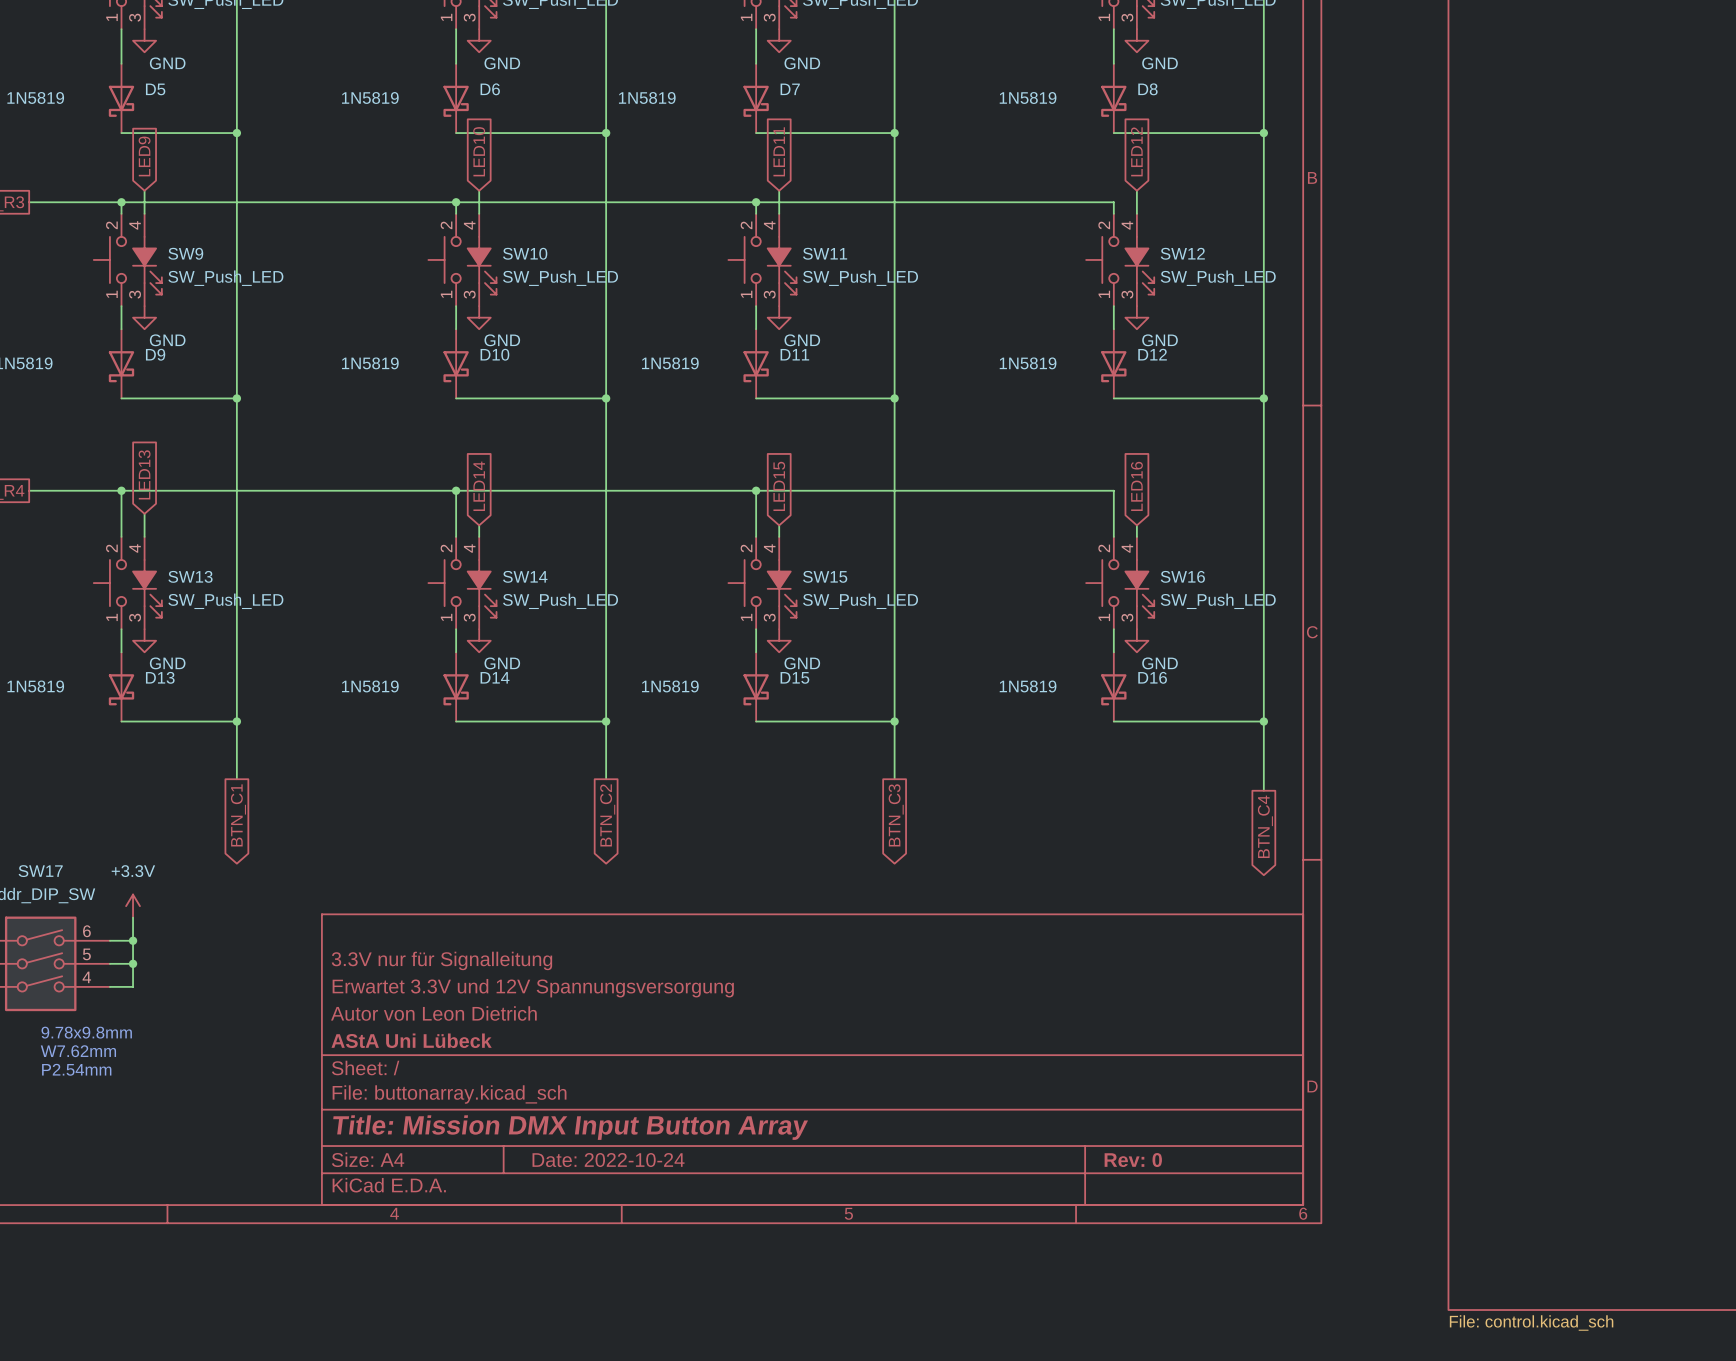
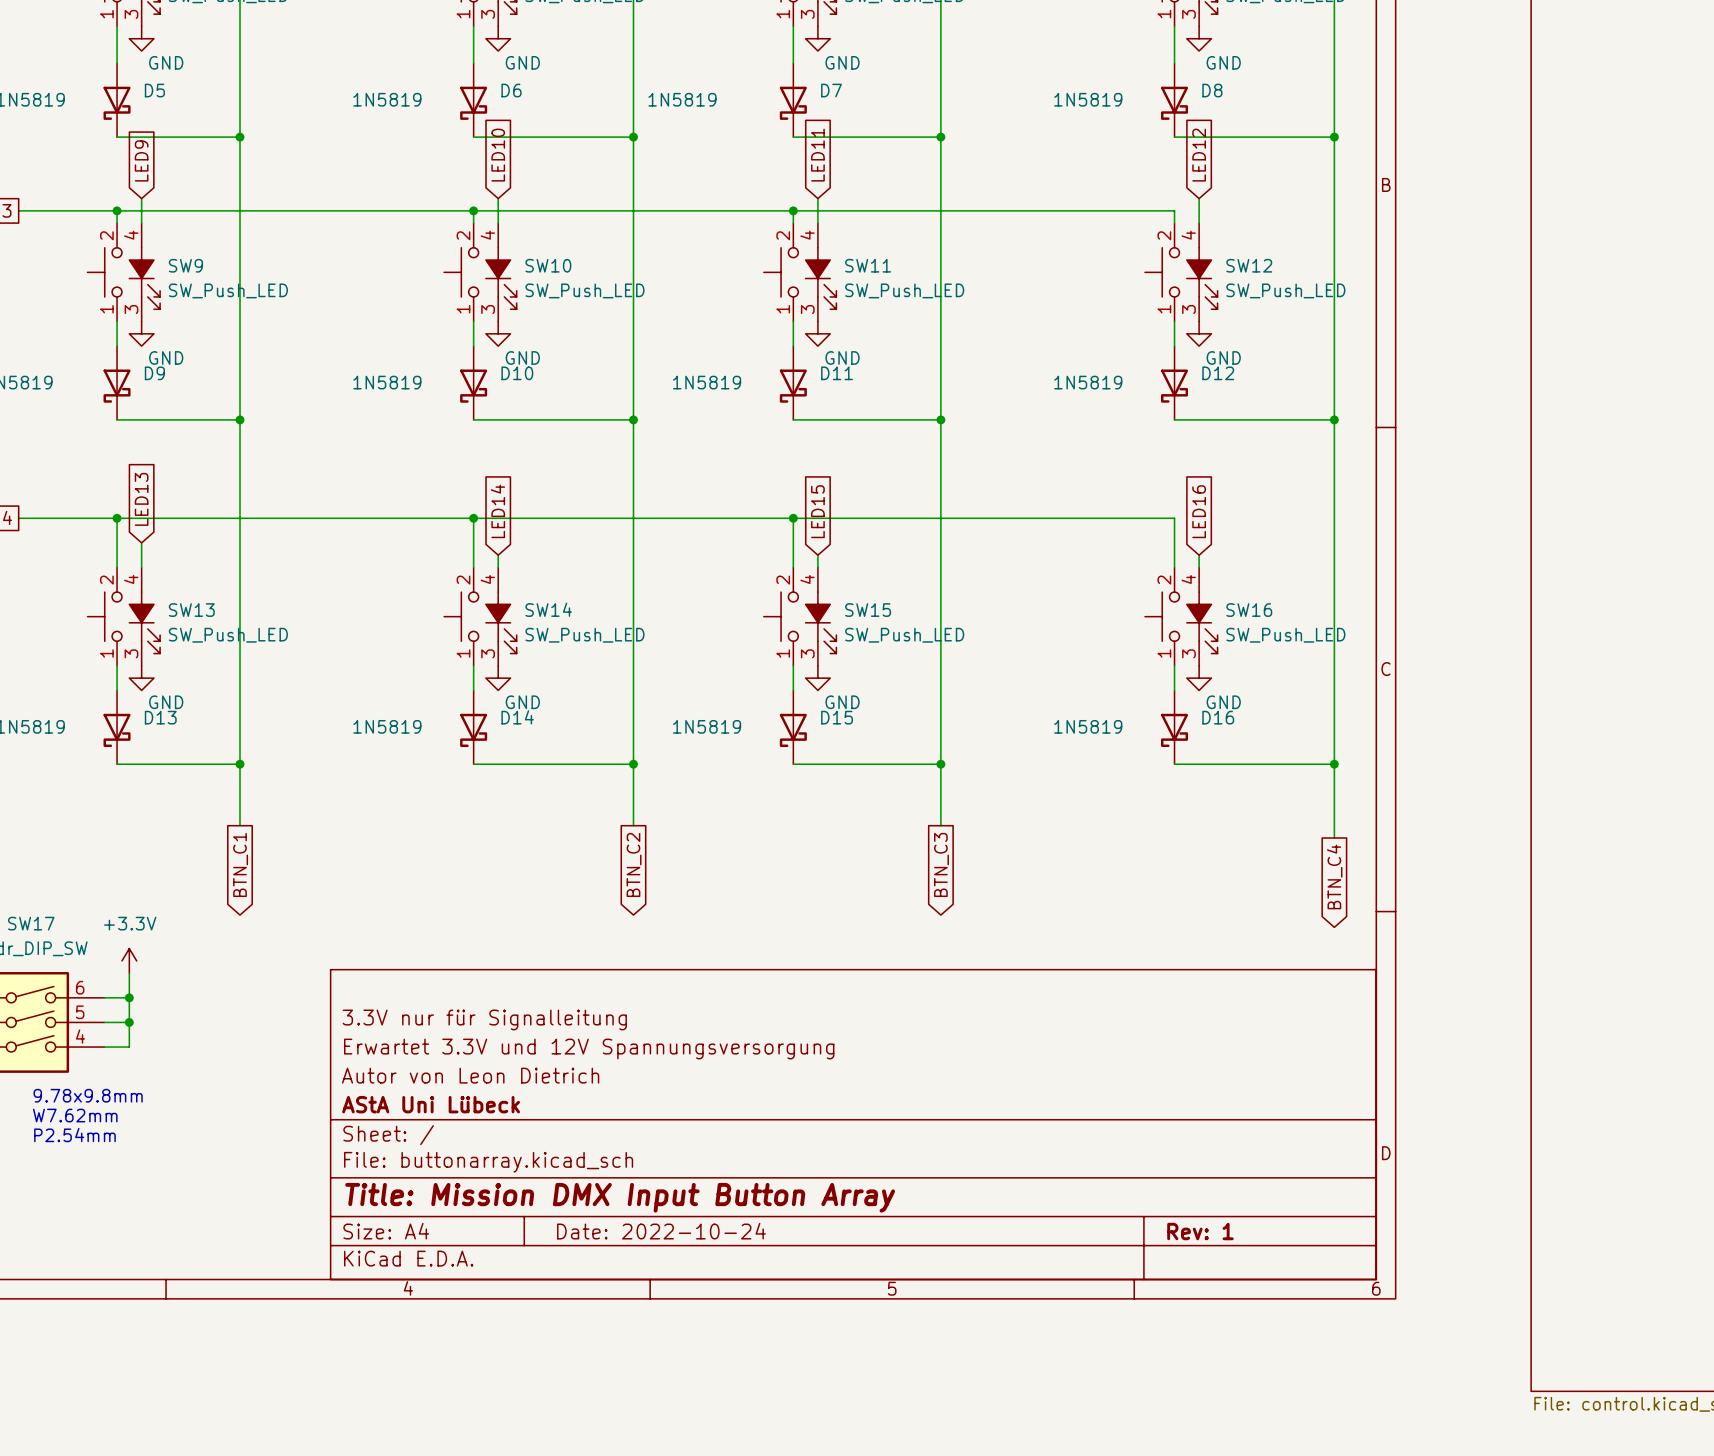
title block: Rev: 0 (1133, 1160) -> Rev: 1 (1200, 1231)

